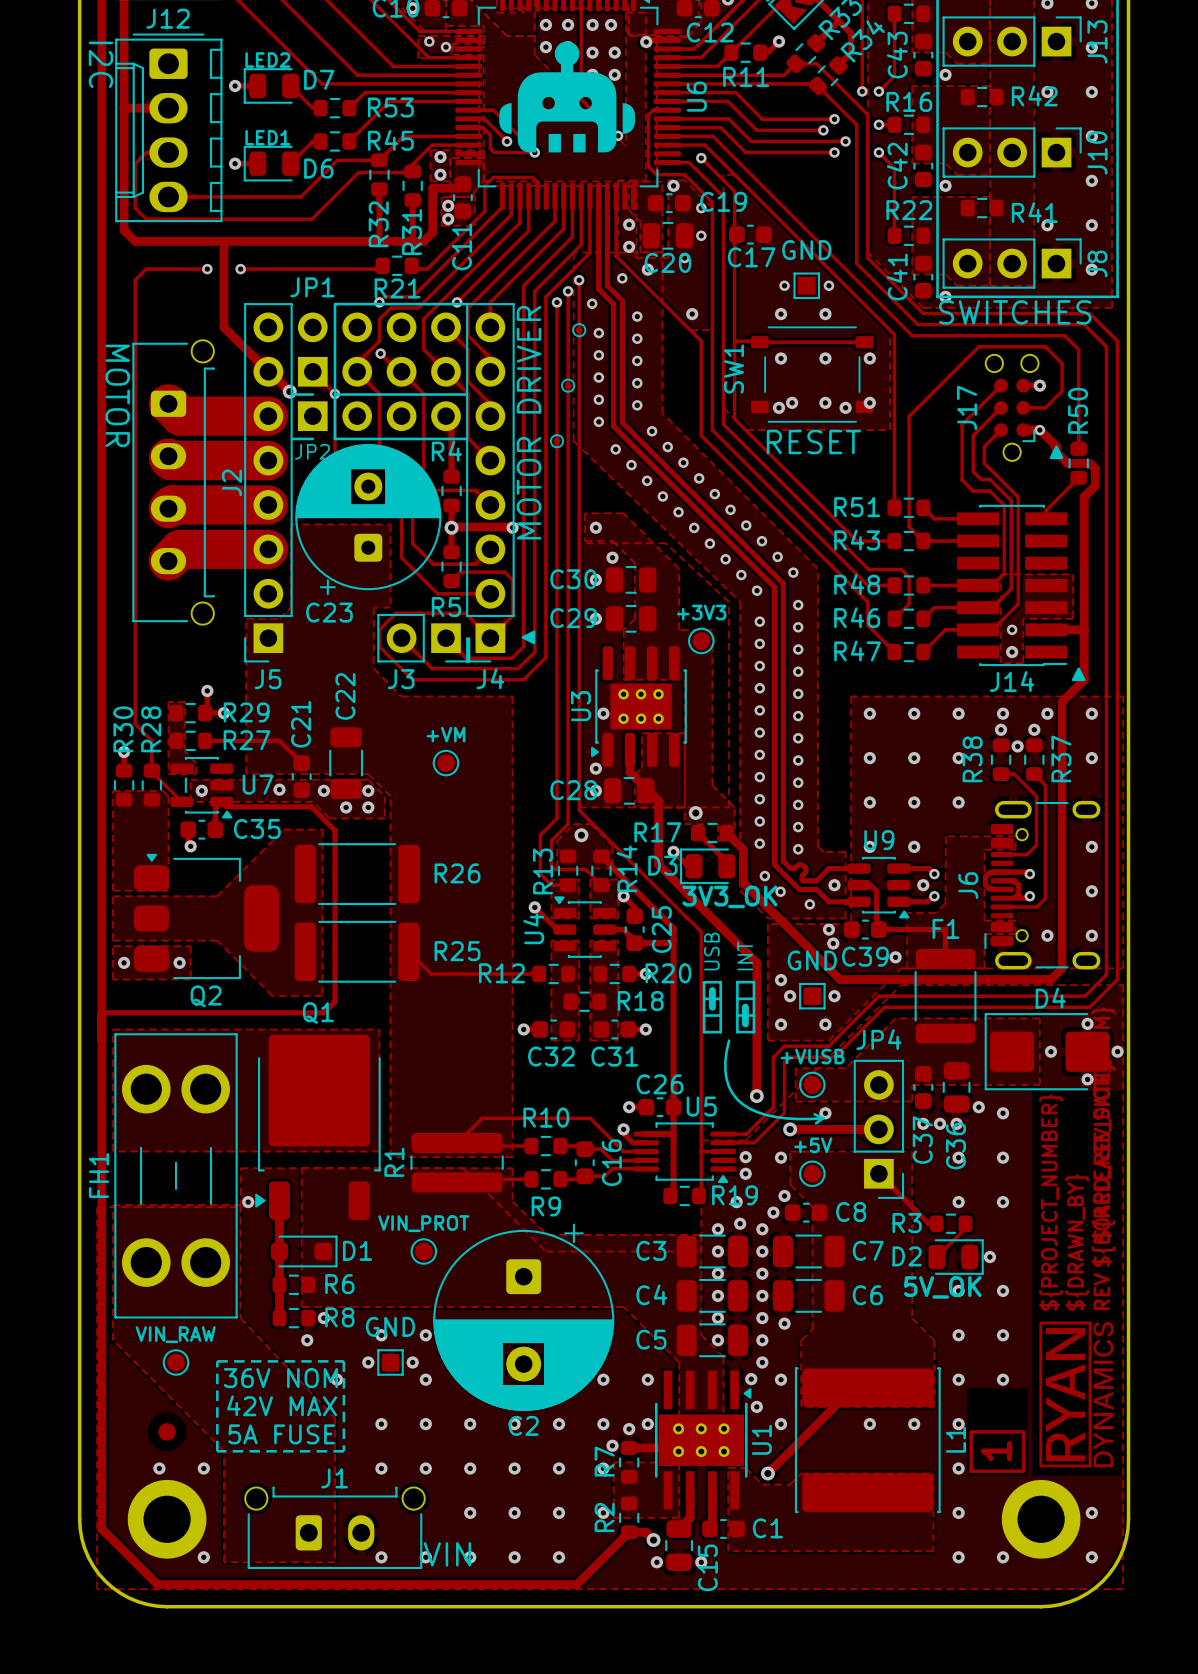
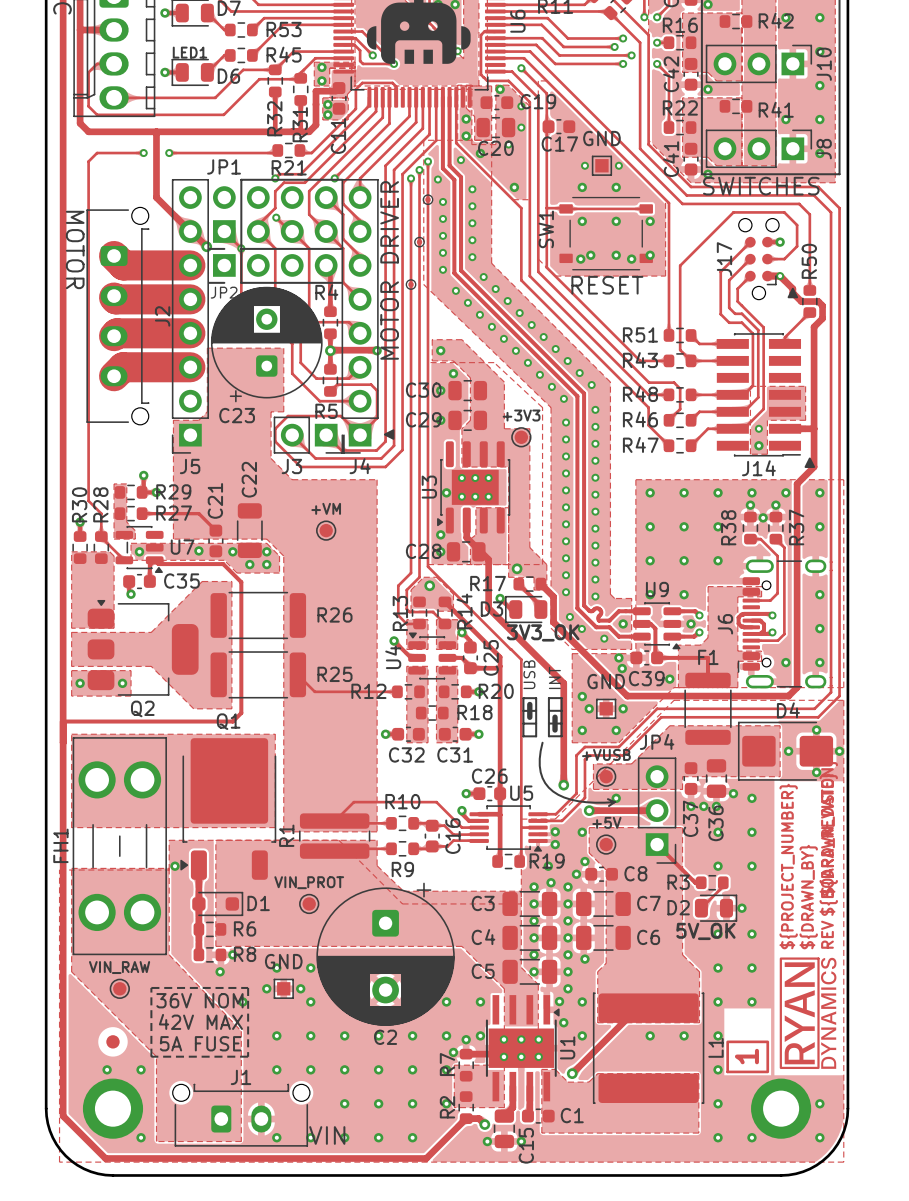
drawing shape: [1038, 1006, 1116, 1468] -> [779, 760, 838, 1070]

